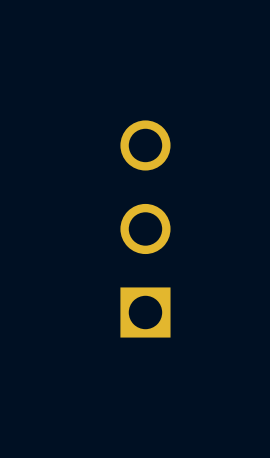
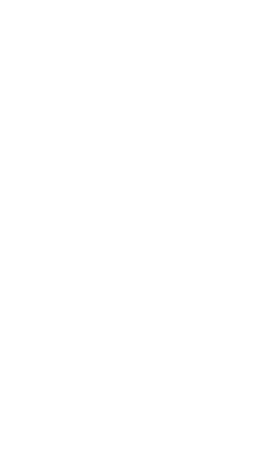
part: (145, 228) -> none

